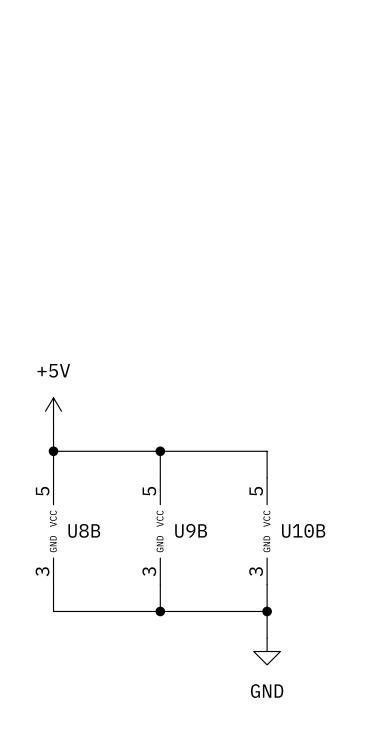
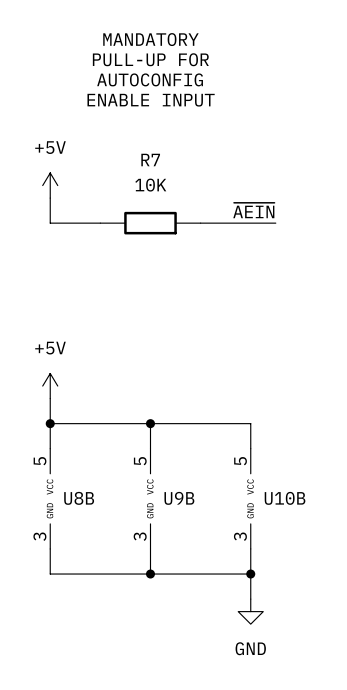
text: none -> MANDATORY (150, 39)
text: none -> PULL-UP FOR (150, 59)
text: none -> AUTOCONFIG (150, 79)
text: none -> ENABLE INPUT (151, 100)
power symbol: none -> +5V (50, 185)
wire: none -> (50, 198) (50, 223) (100, 223)
label: none -> ~{AEIN} (253, 210)
R7: none -> 10K (150, 223)
wire: none -> (200, 223) (275, 223)

